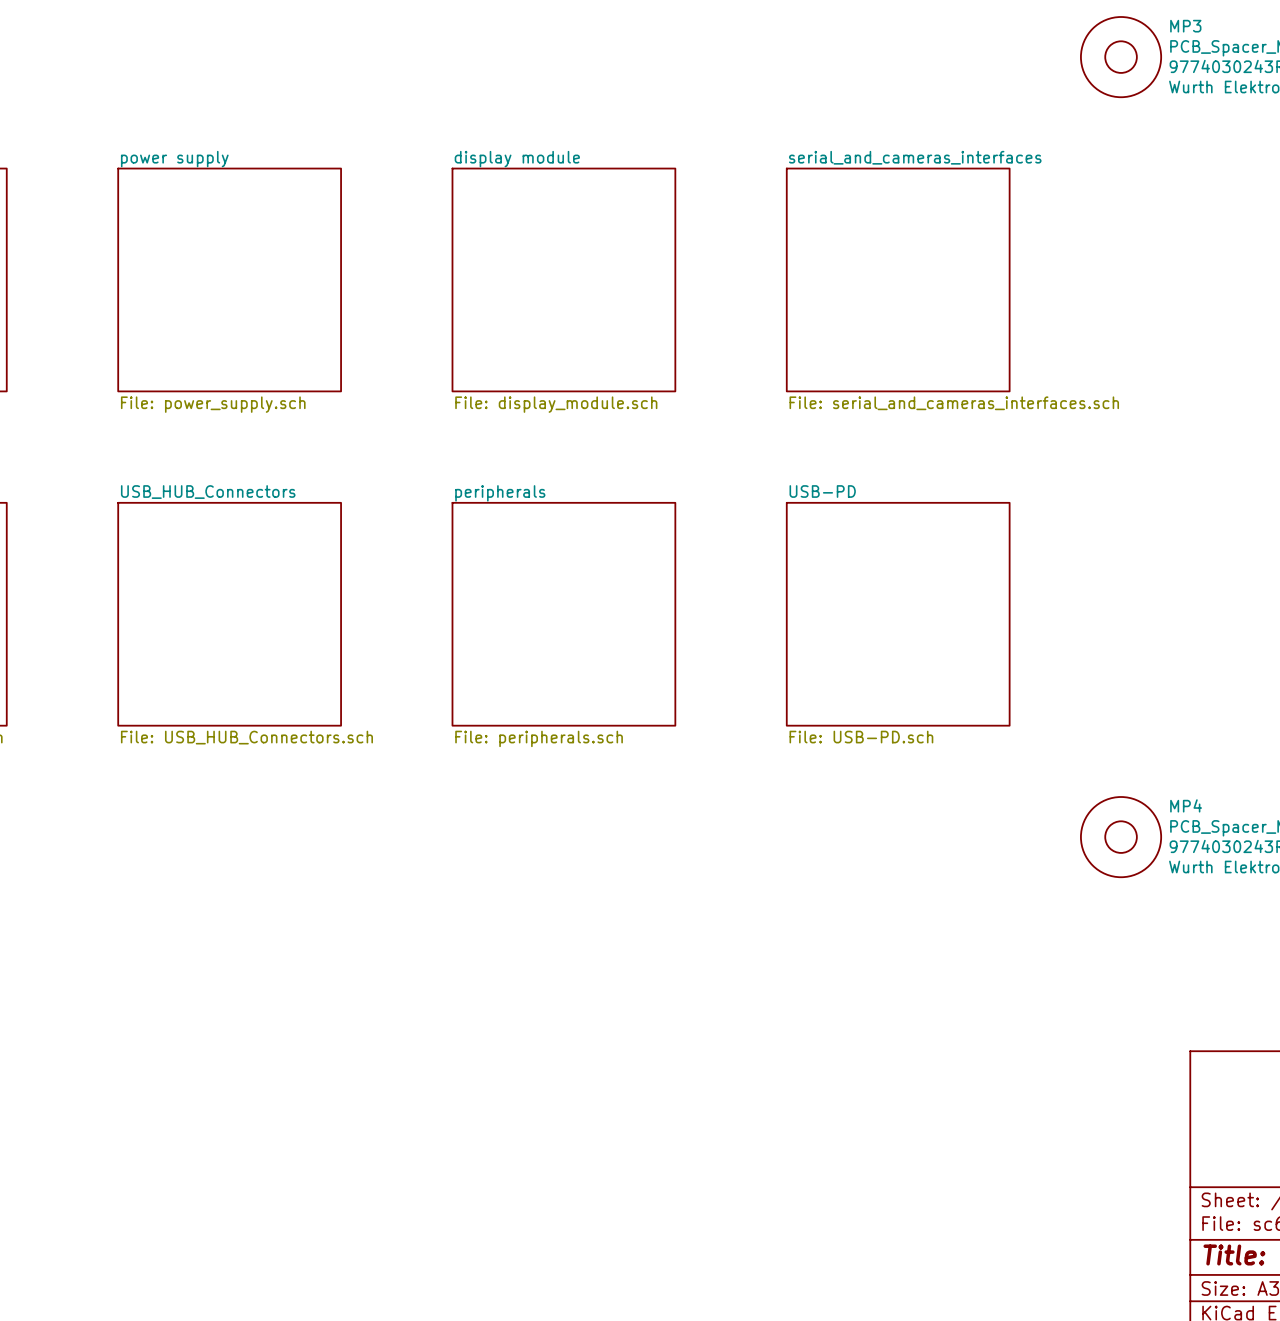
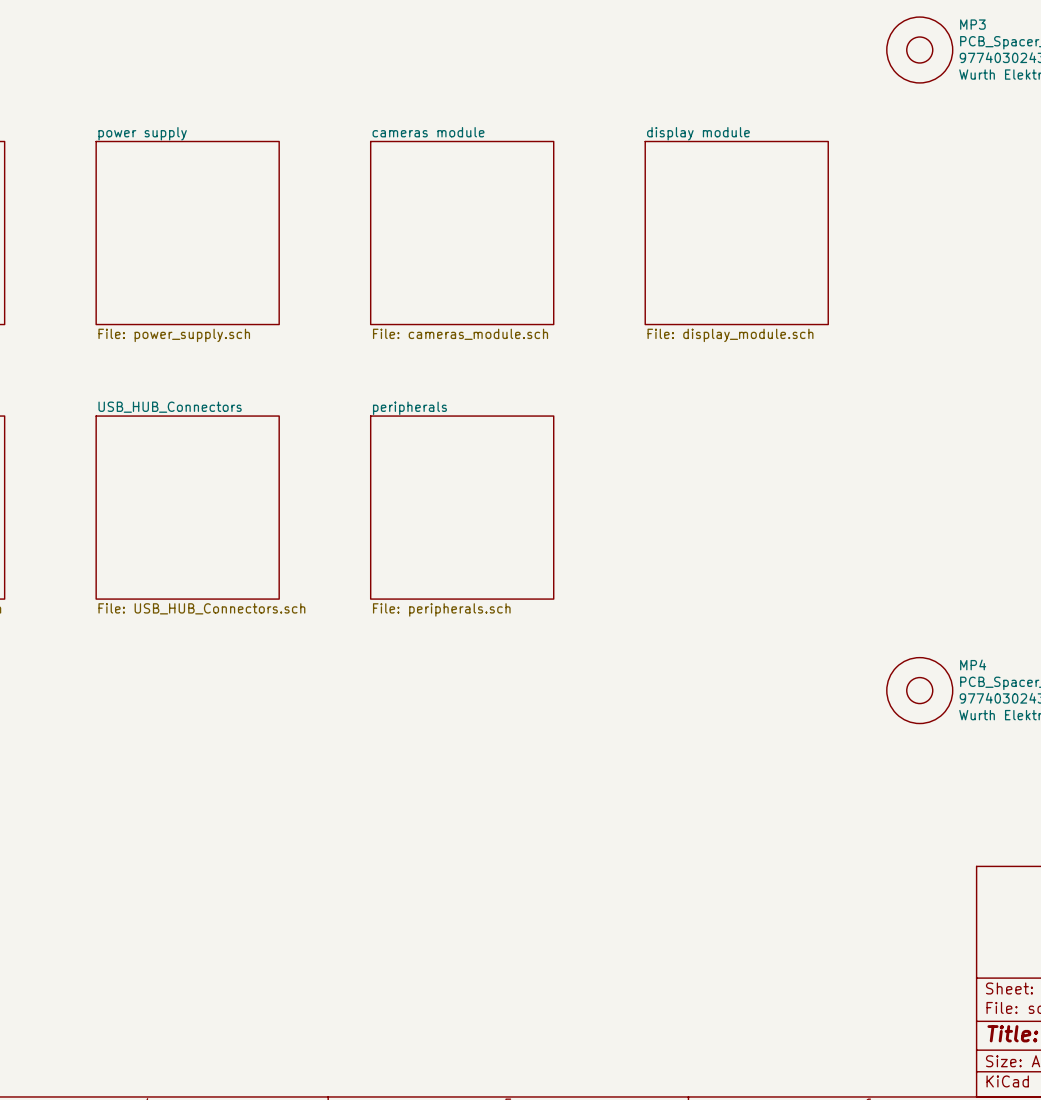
sheet serial_and_cameras_interfaces name: serial_and_cameras_interfaces (915, 157) -> display module (698, 133)
sheet display module name: display module (517, 159) -> cameras module (428, 132)
sheet serial_and_cameras_interfaces value: File: serial_and_cameras_interfaces.sch (954, 403) -> File: display_module.sch (730, 335)
sheet display module value: File: display_module.sch (556, 404) -> File: cameras_module.sch (460, 334)
sheet USB-PD: File: USB-PD.sch (898, 614) -> none

